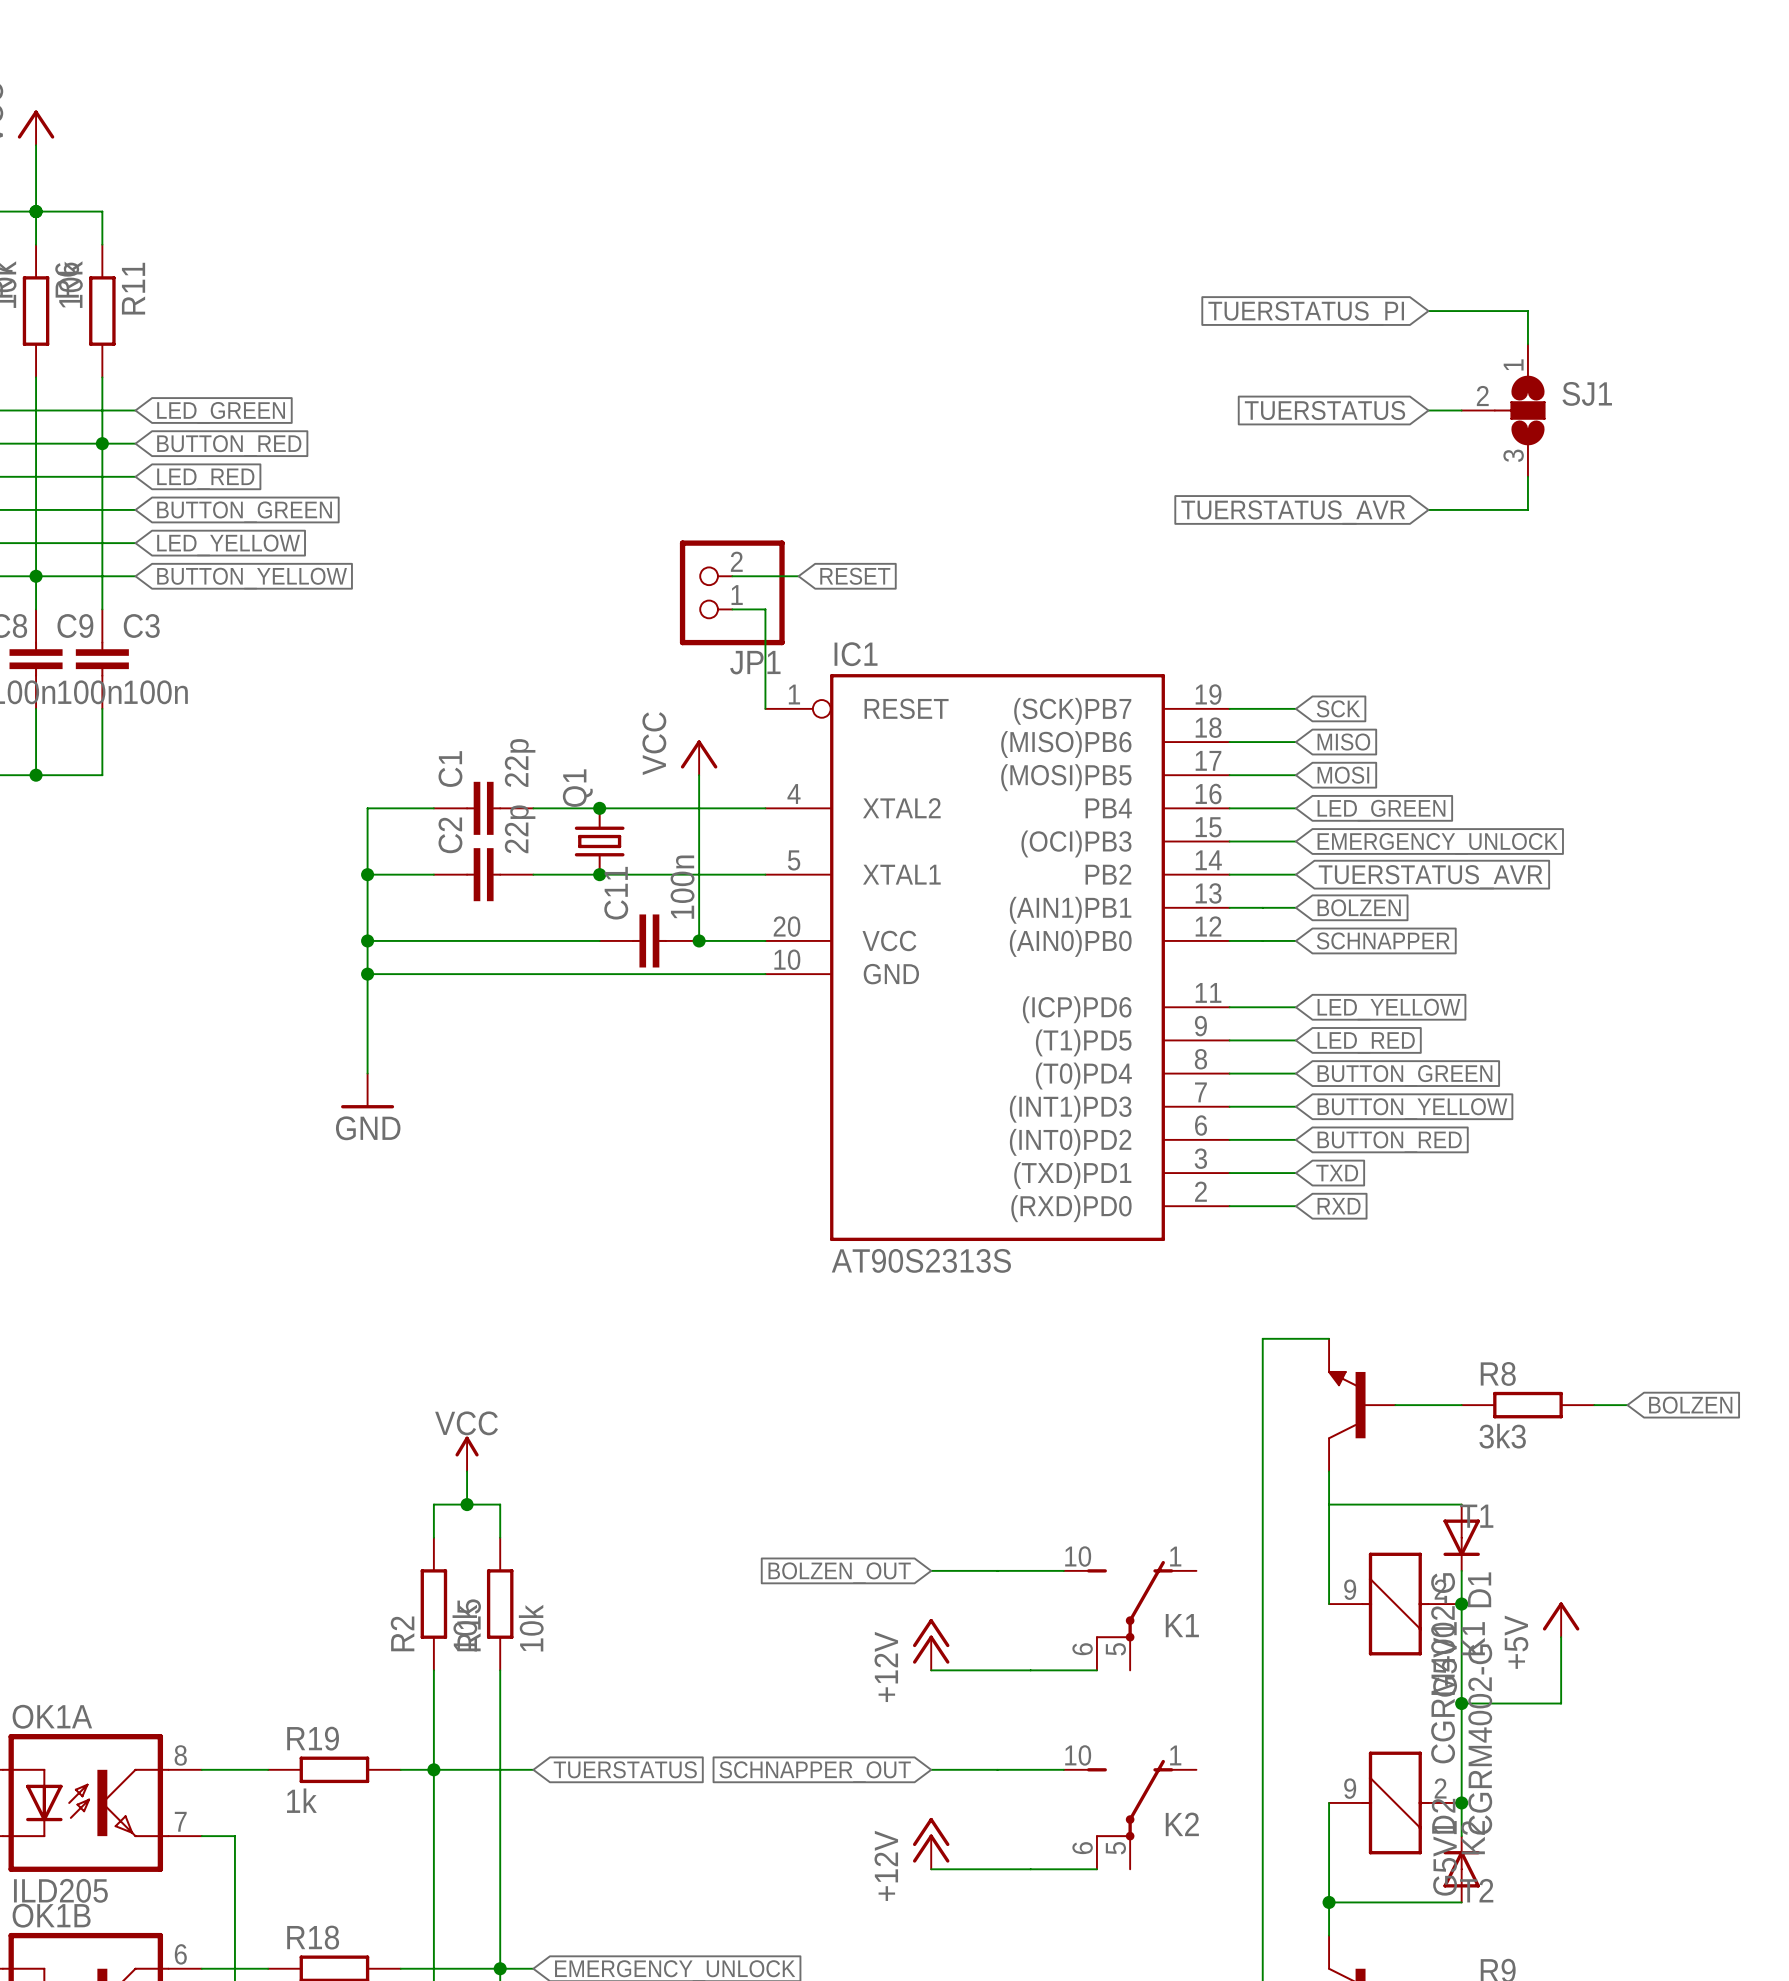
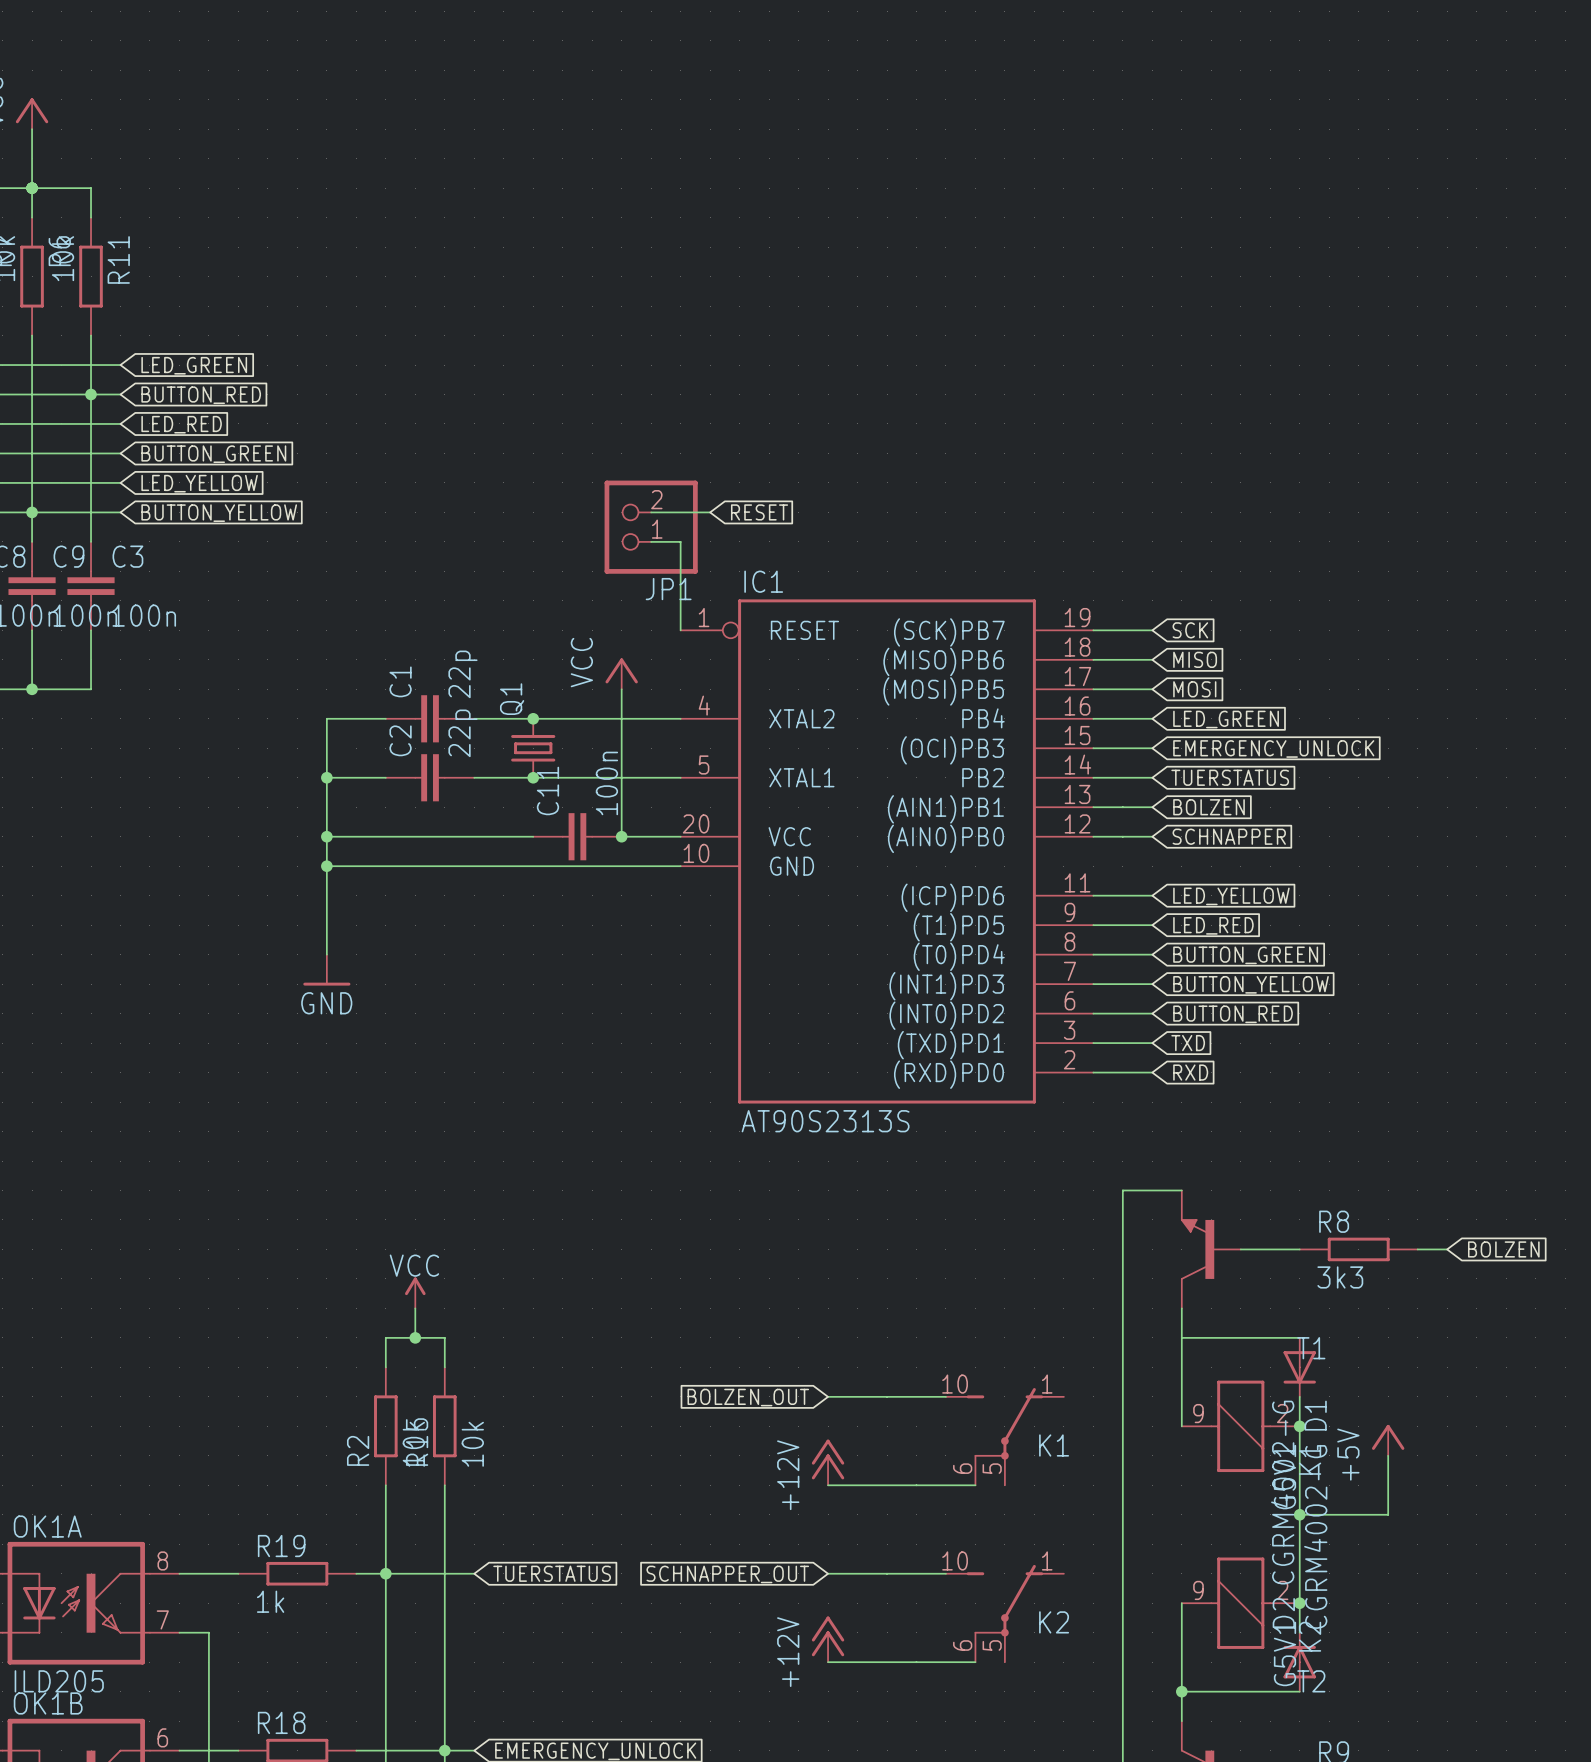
wire: (1428, 311) (1527, 311) (1527, 344) -> none
global label: TUERSTATUS_PI (1306, 313) -> none
global label: TUERSTATUS (1324, 410) -> none
wire: (1428, 410) (1461, 410) -> none
SJ1: (1503, 410) -> none
wire: (1527, 476) (1527, 509) (1428, 509) -> none
global label: TUERSTATUS_AVR (1293, 512) -> none
global label: TUERSTATUS_AVR (1430, 877) -> TUERSTATUS (1230, 777)

